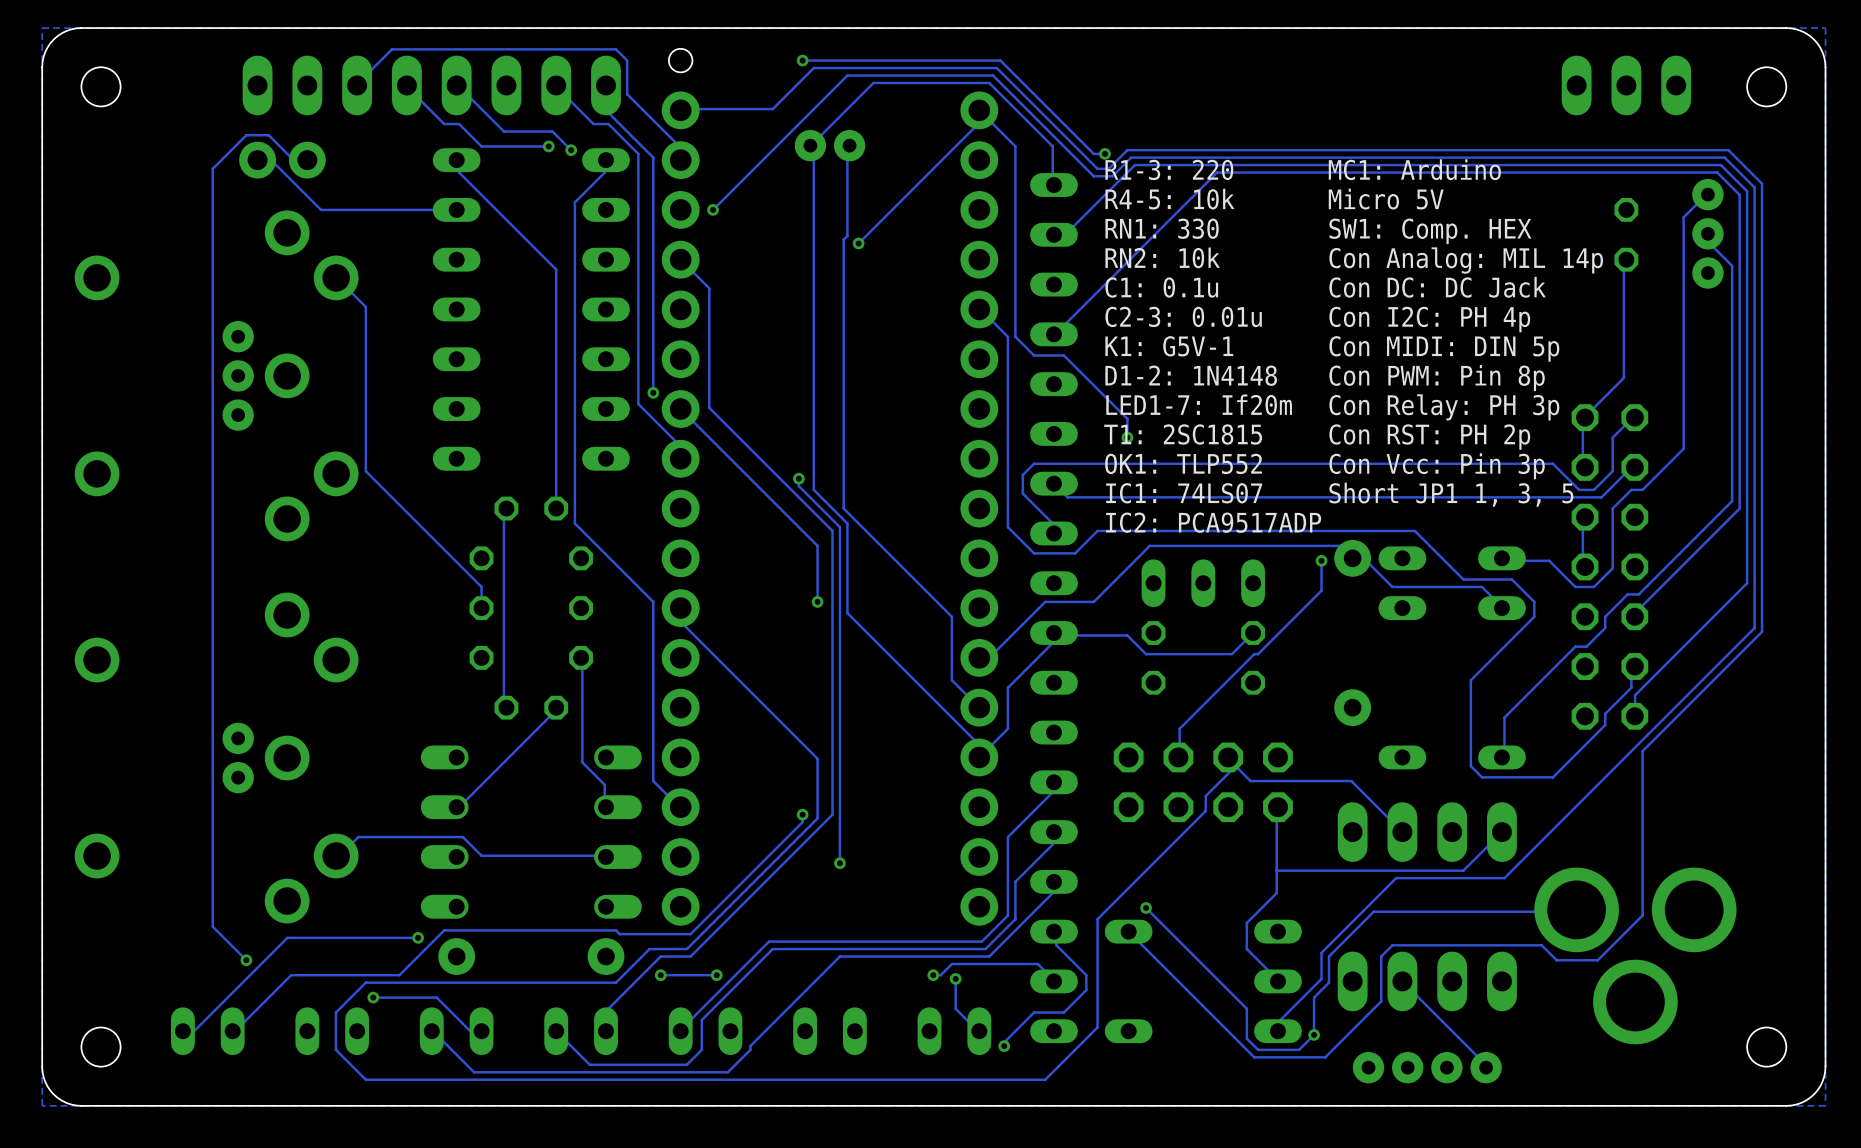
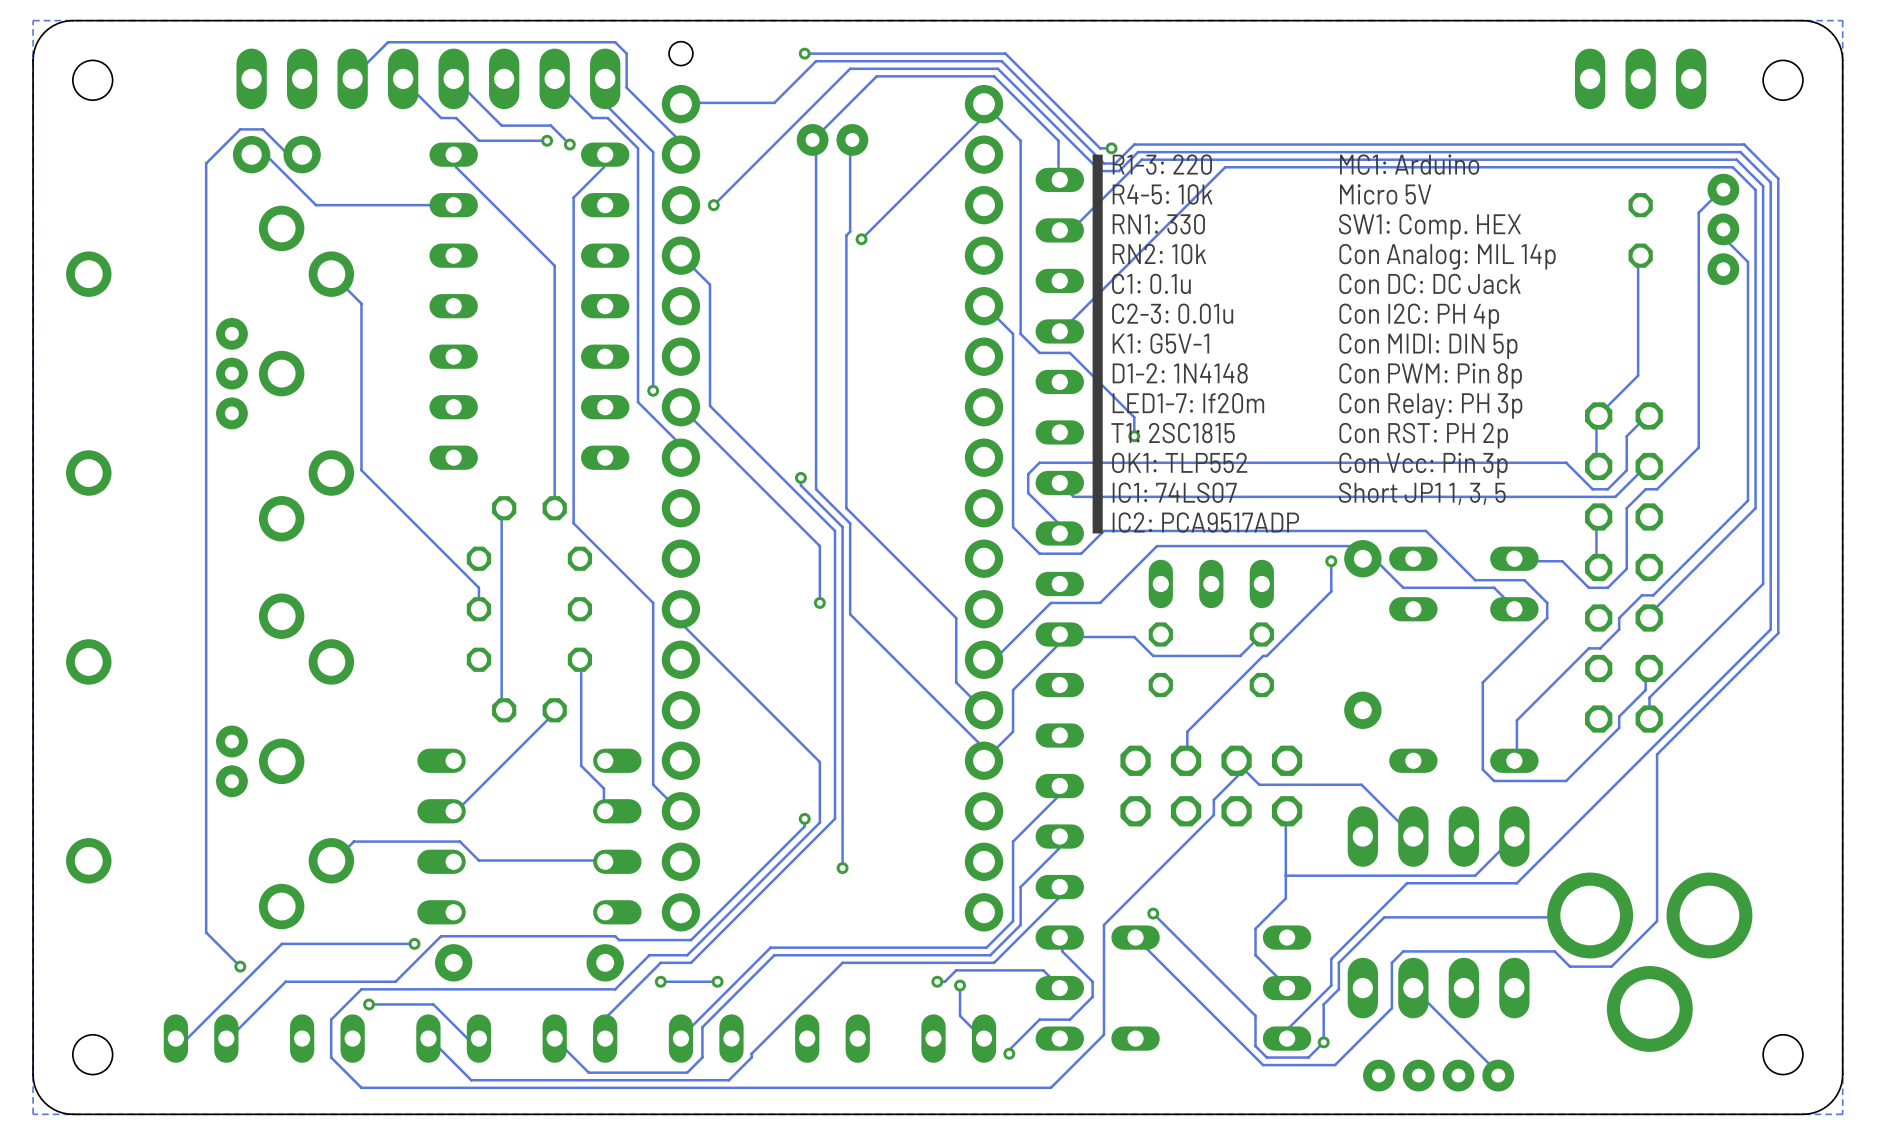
drawing: none -> [1092, 154, 1103, 534]

